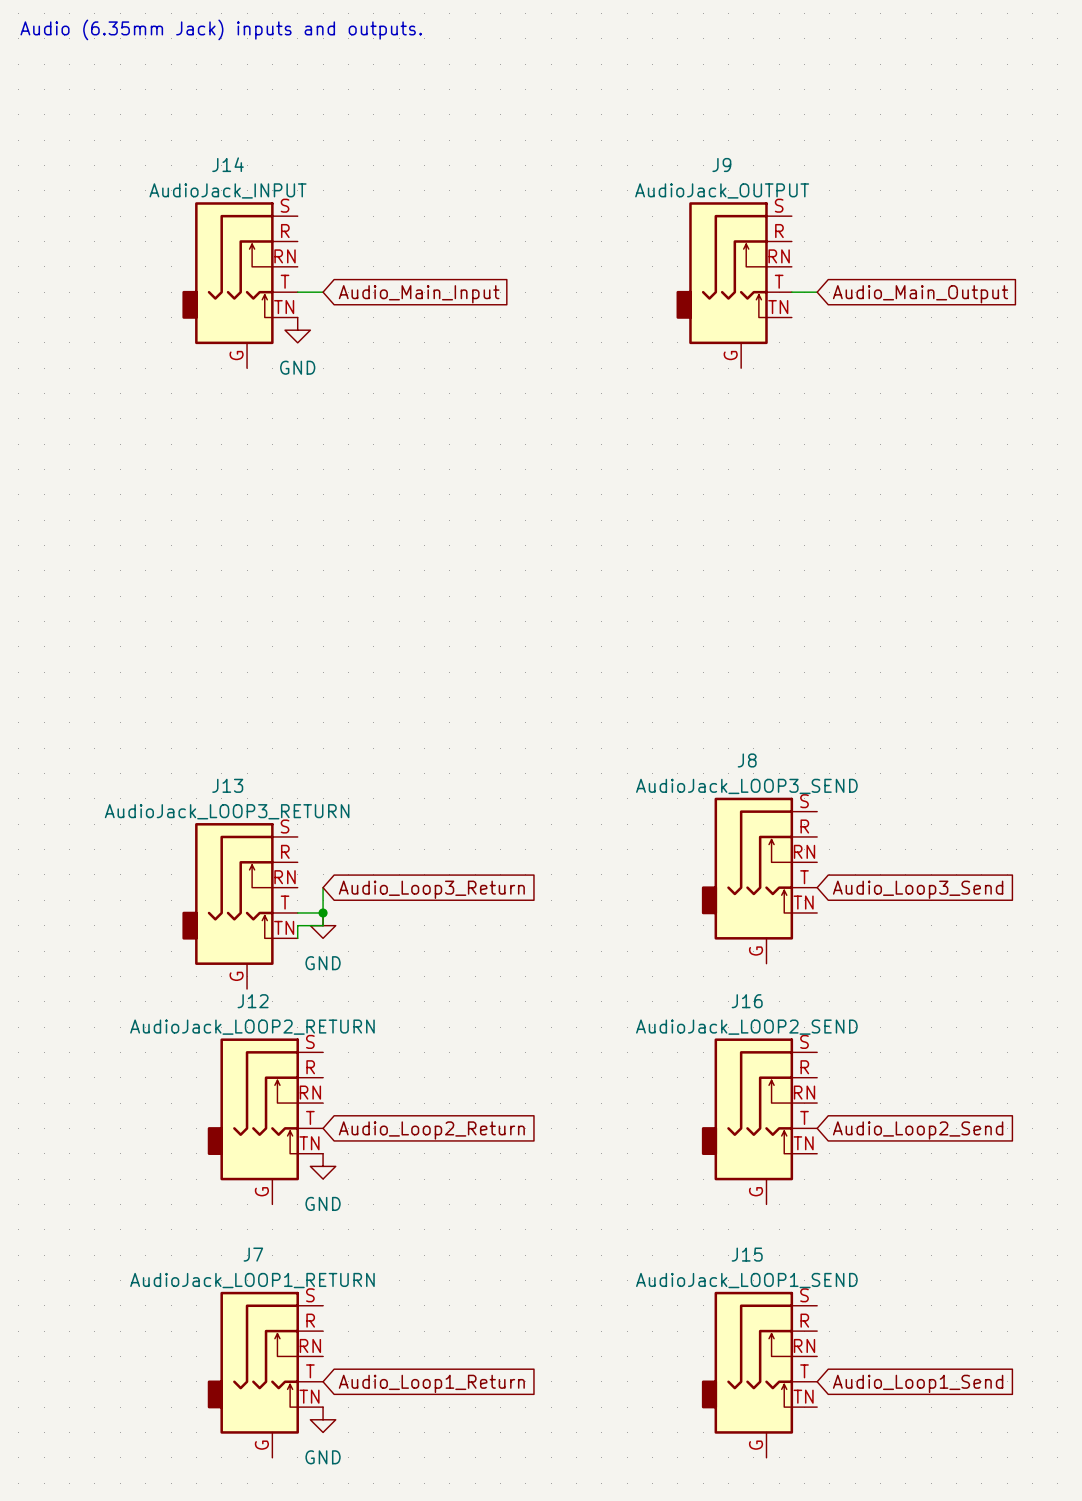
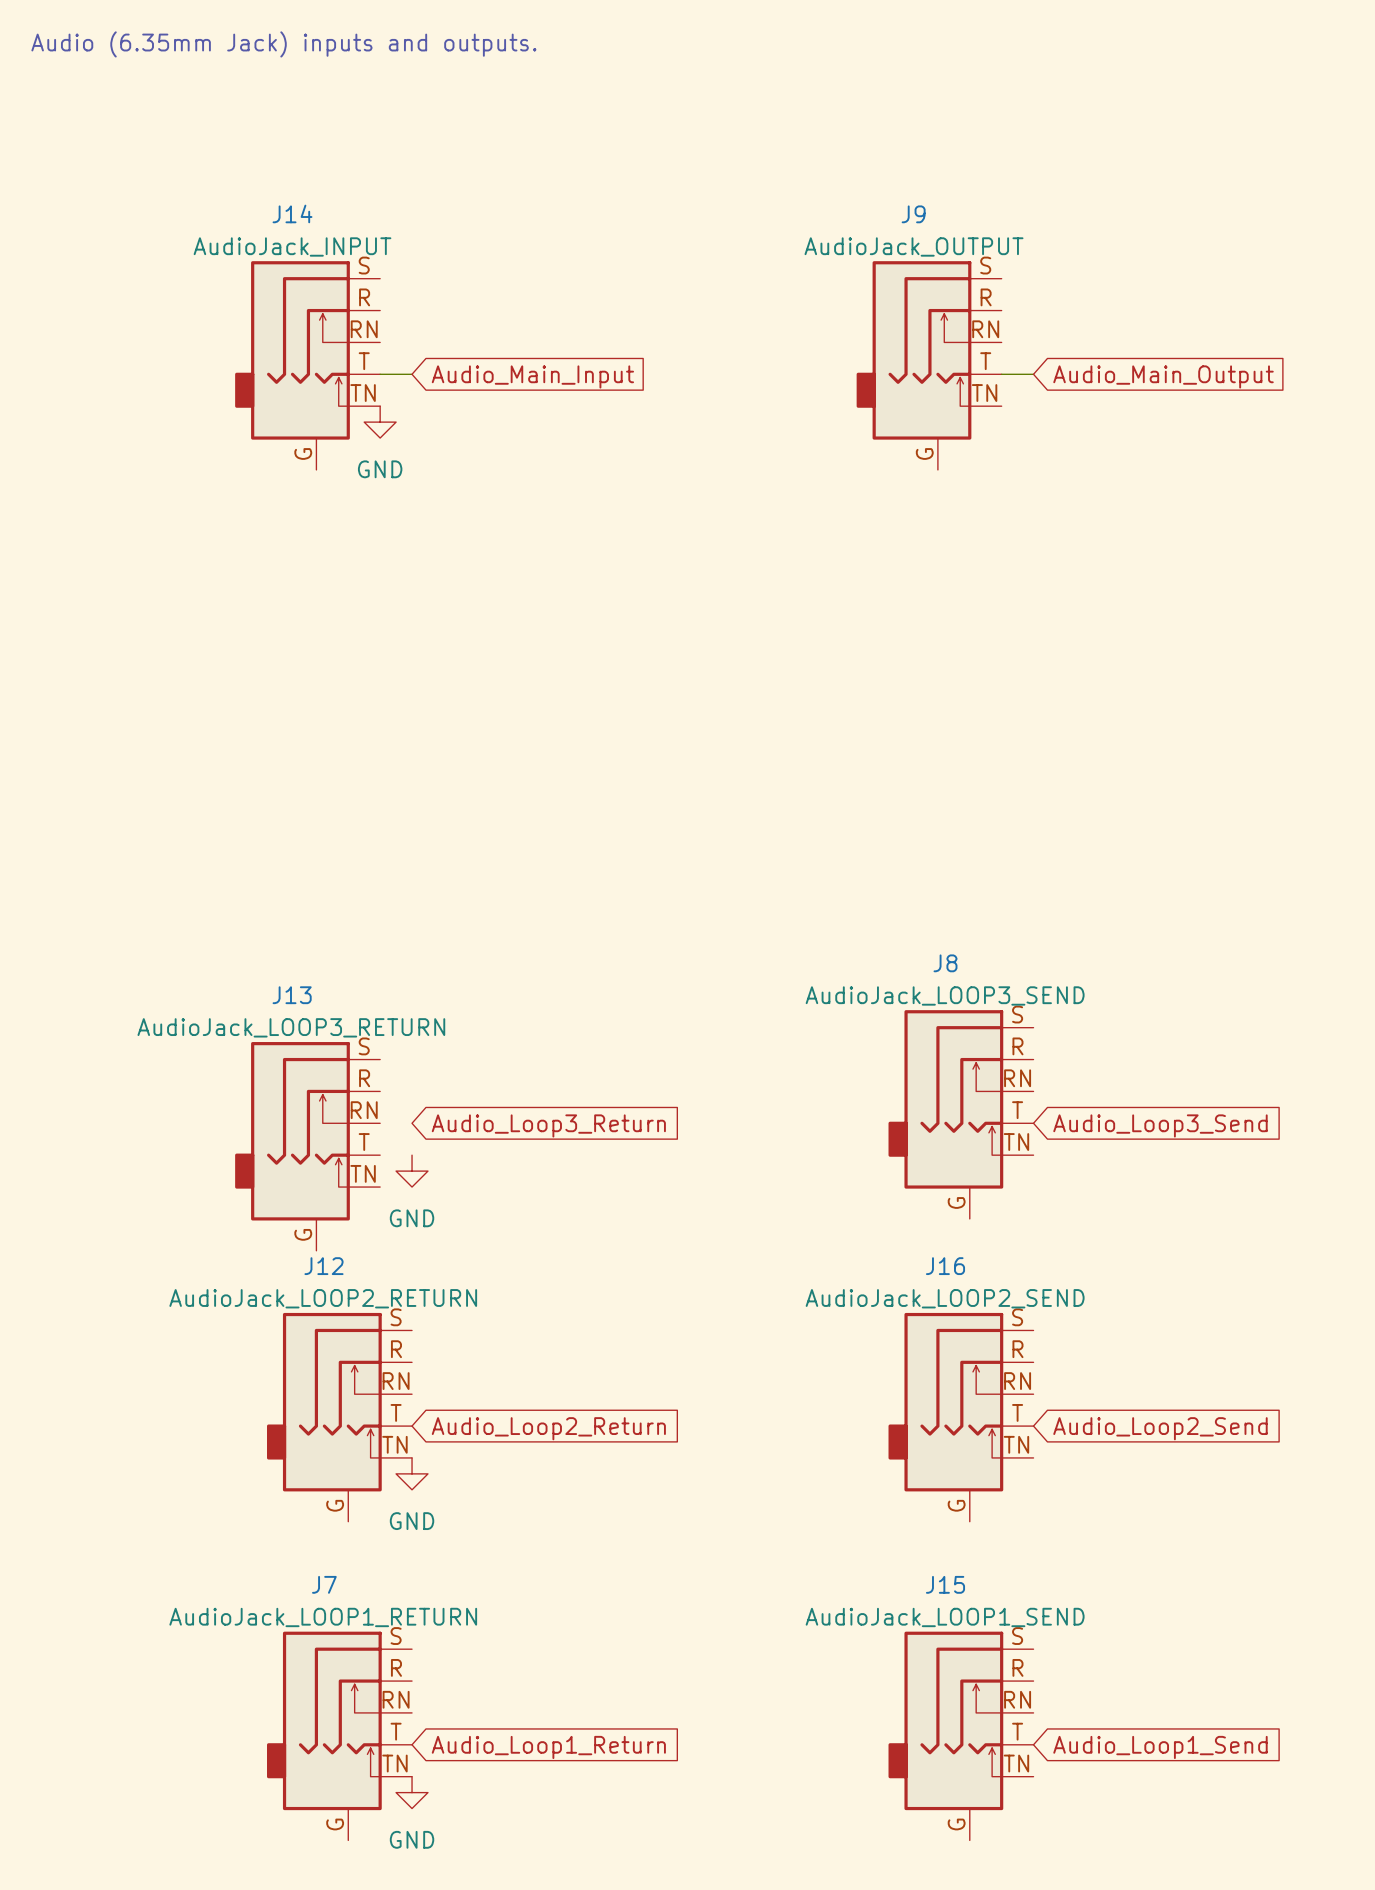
wire: (323, 887) (323, 925) (297, 925) (297, 938) -> none
wire: (297, 912) (323, 912) -> none
junction: (323, 912) -> none

